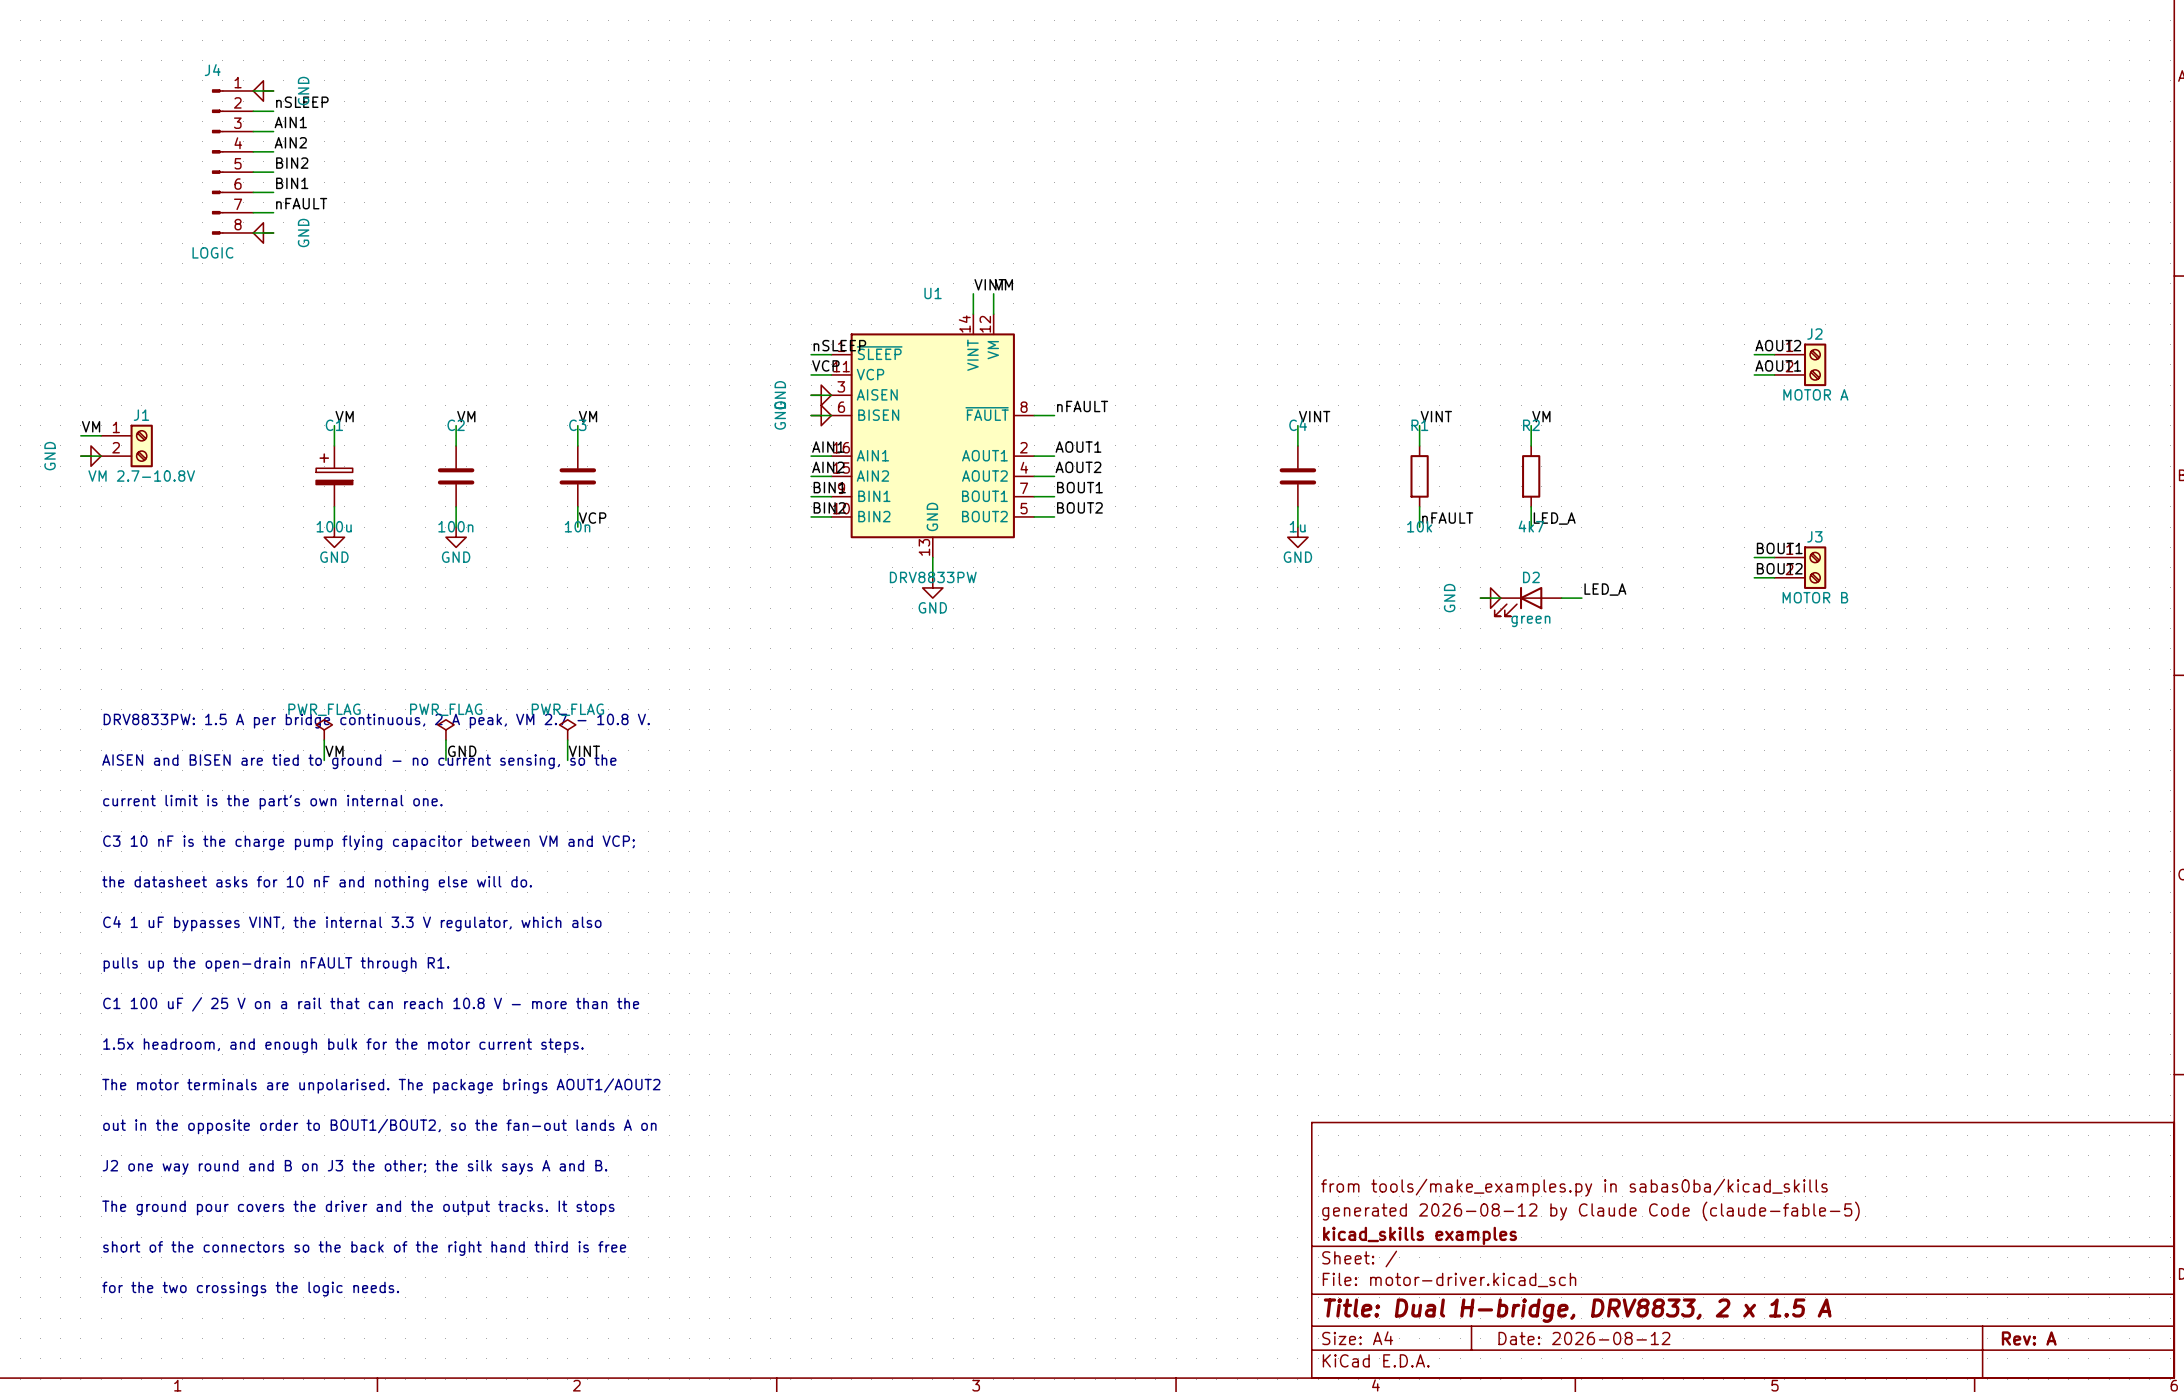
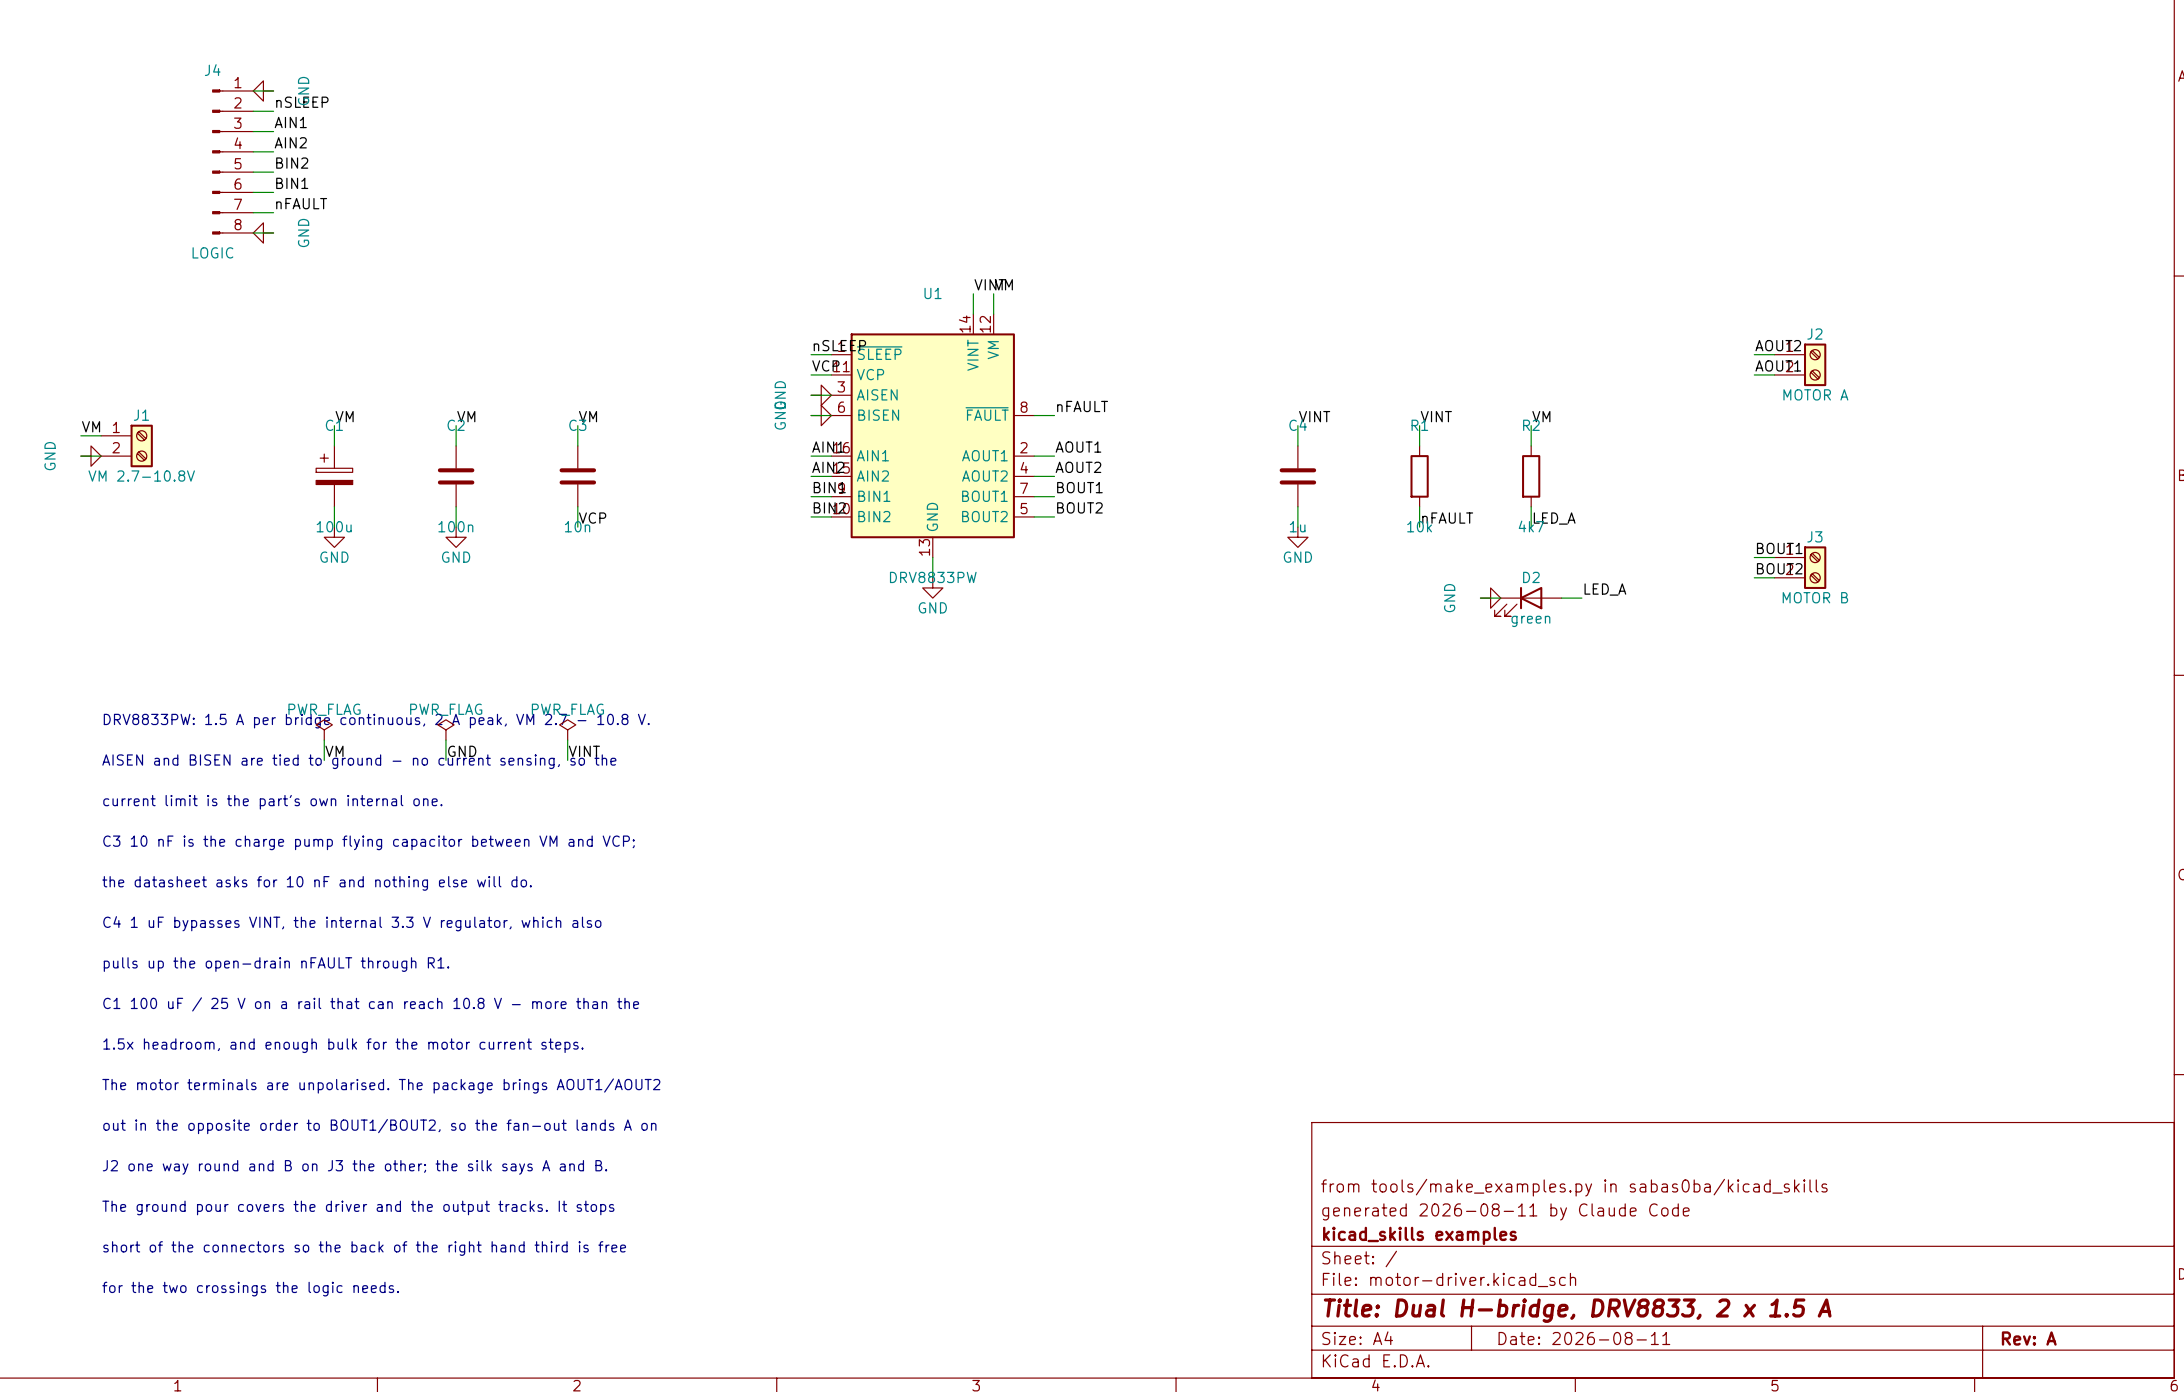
title block: generated 2026-08-12 by Claude Code (claude-fable-5) (1590, 1211) -> generated 2026-08-11 by Claude Code (1505, 1211)
title block: Date: 2026-08-12 (1584, 1338) -> Date: 2026-08-11 (1584, 1338)

